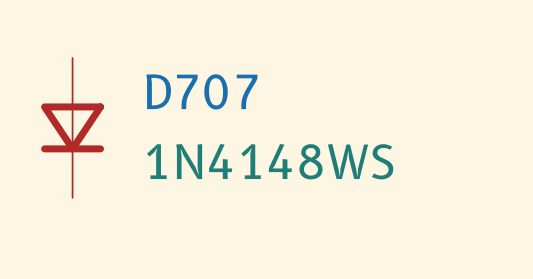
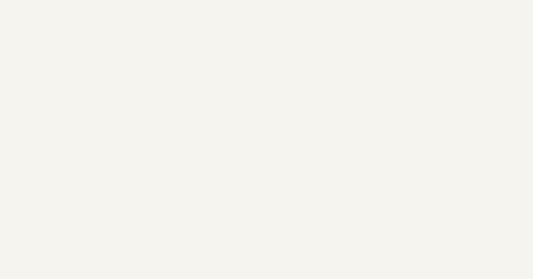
D707: 1N4148WS (72, 127) -> none

